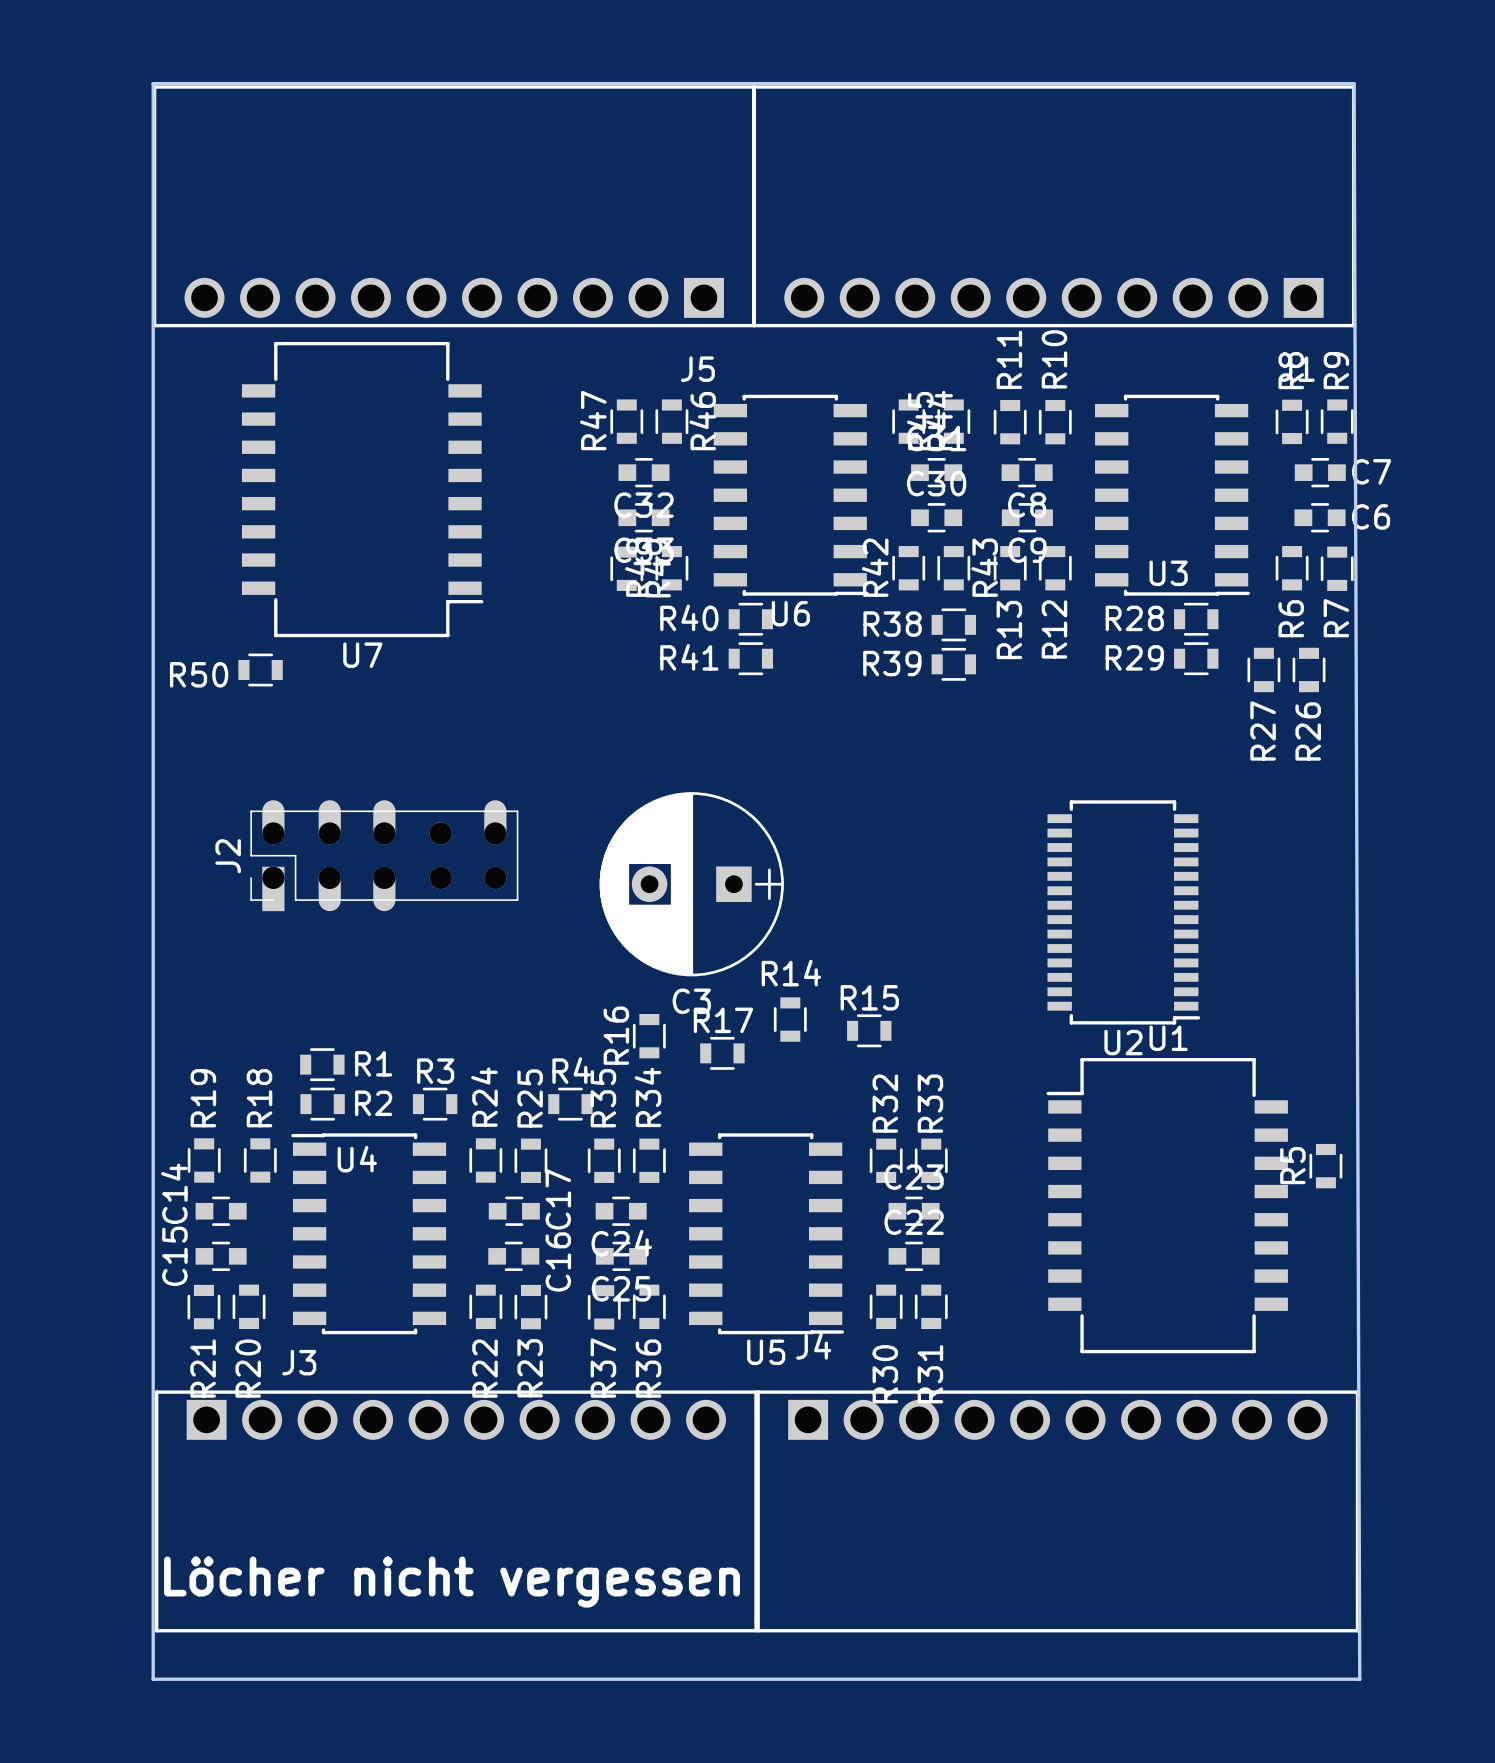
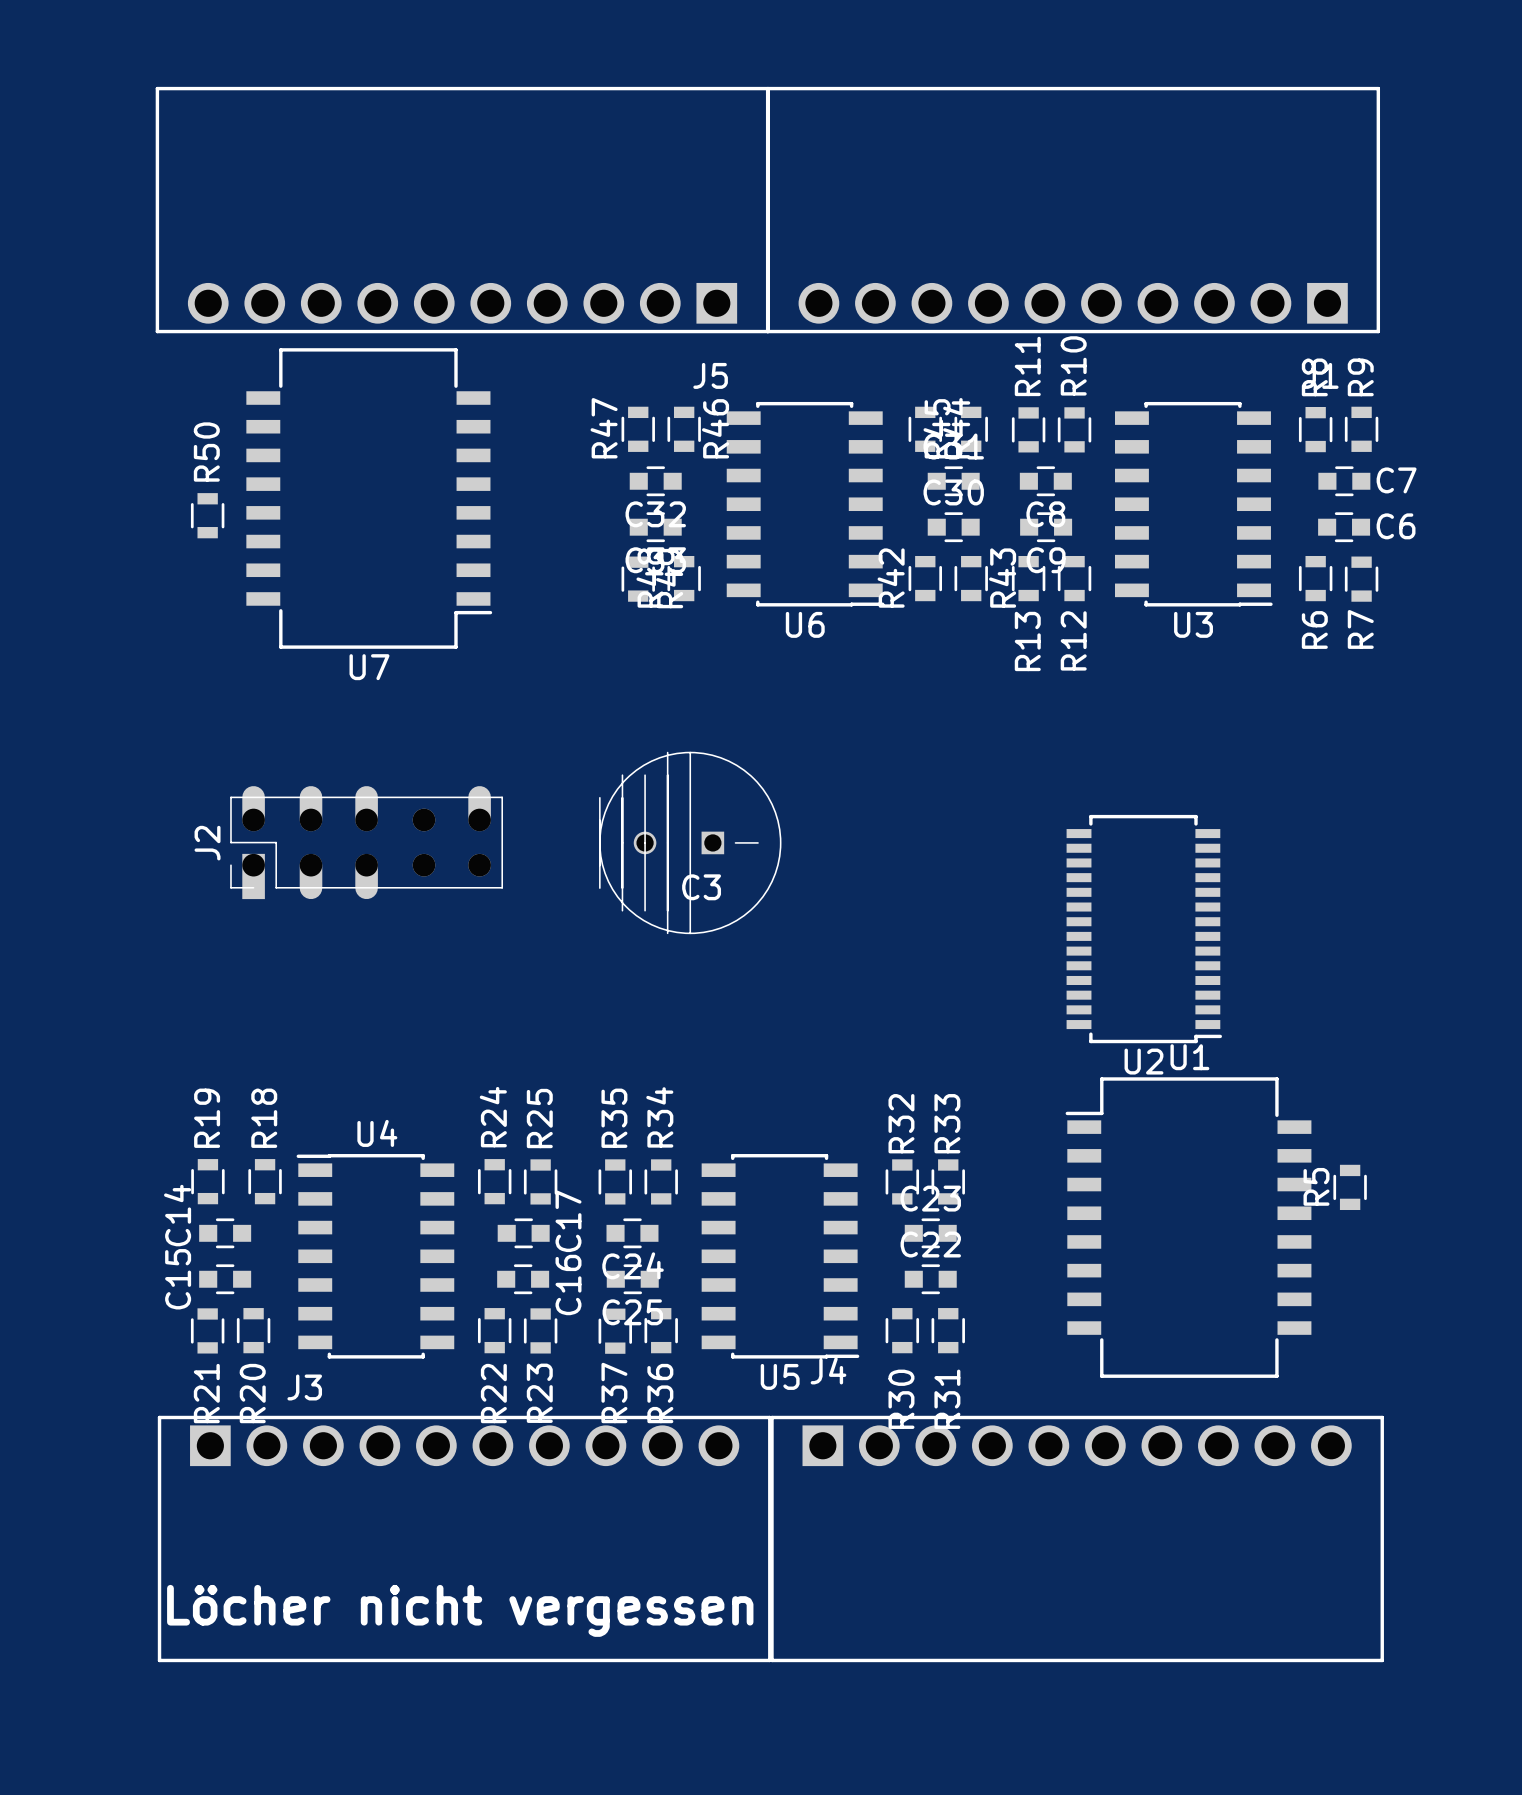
board edge: (153, 83) (1354, 83) (1359, 1679) (153, 1679) (153, 83) -> none
U3 name position: U3 (1168, 573) -> U3 (1193, 624)
R40: (750, 619) -> none
R28: (1196, 619) -> none
R38: (953, 624) -> none
R41: (750, 658) -> none
R29: (1196, 658) -> none
R39: (953, 664) -> none
R50 rotation: 0° (260, 669) -> 90° clockwise (207, 515)
R50 position: (260, 669) -> (207, 515)
R27: (1263, 669) -> none
R26: (1309, 669) -> none
C3 footprint: [599, 792, 785, 977] -> [599, 752, 781, 934]
J2 position: (384, 855) -> (366, 842)
C3 name position: C3 (691, 1001) -> C3 (701, 887)
R14: (790, 1019) -> none
R15: (869, 1030) -> none
R16: (649, 1036) -> none
R17: (722, 1053) -> none
R1: (322, 1064) -> none
R2: (322, 1104) -> none
R3: (435, 1104) -> none
R4: (570, 1104) -> none
U4 name position: U4 (357, 1159) -> U4 (377, 1133)

